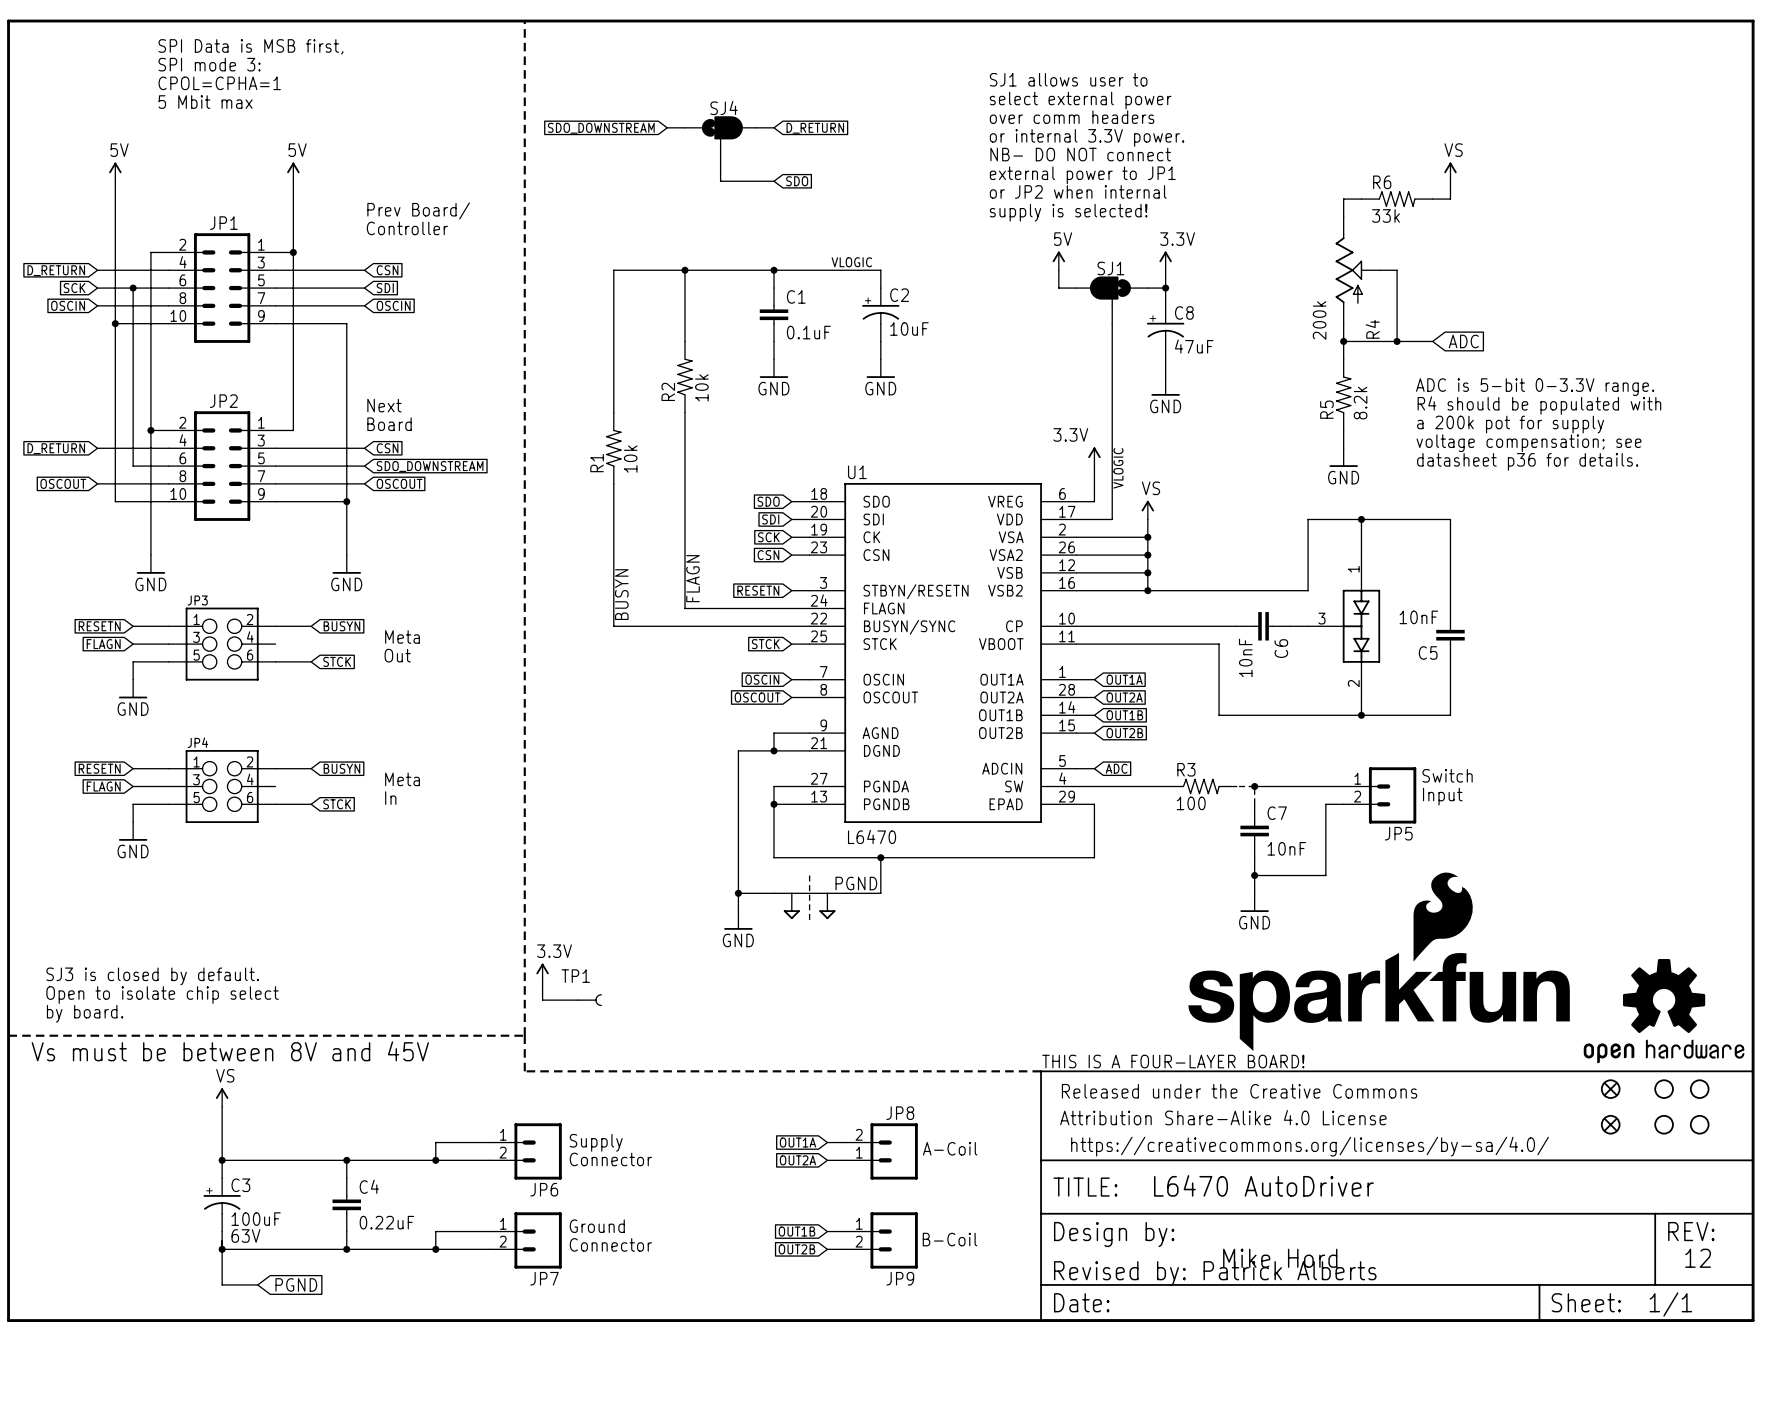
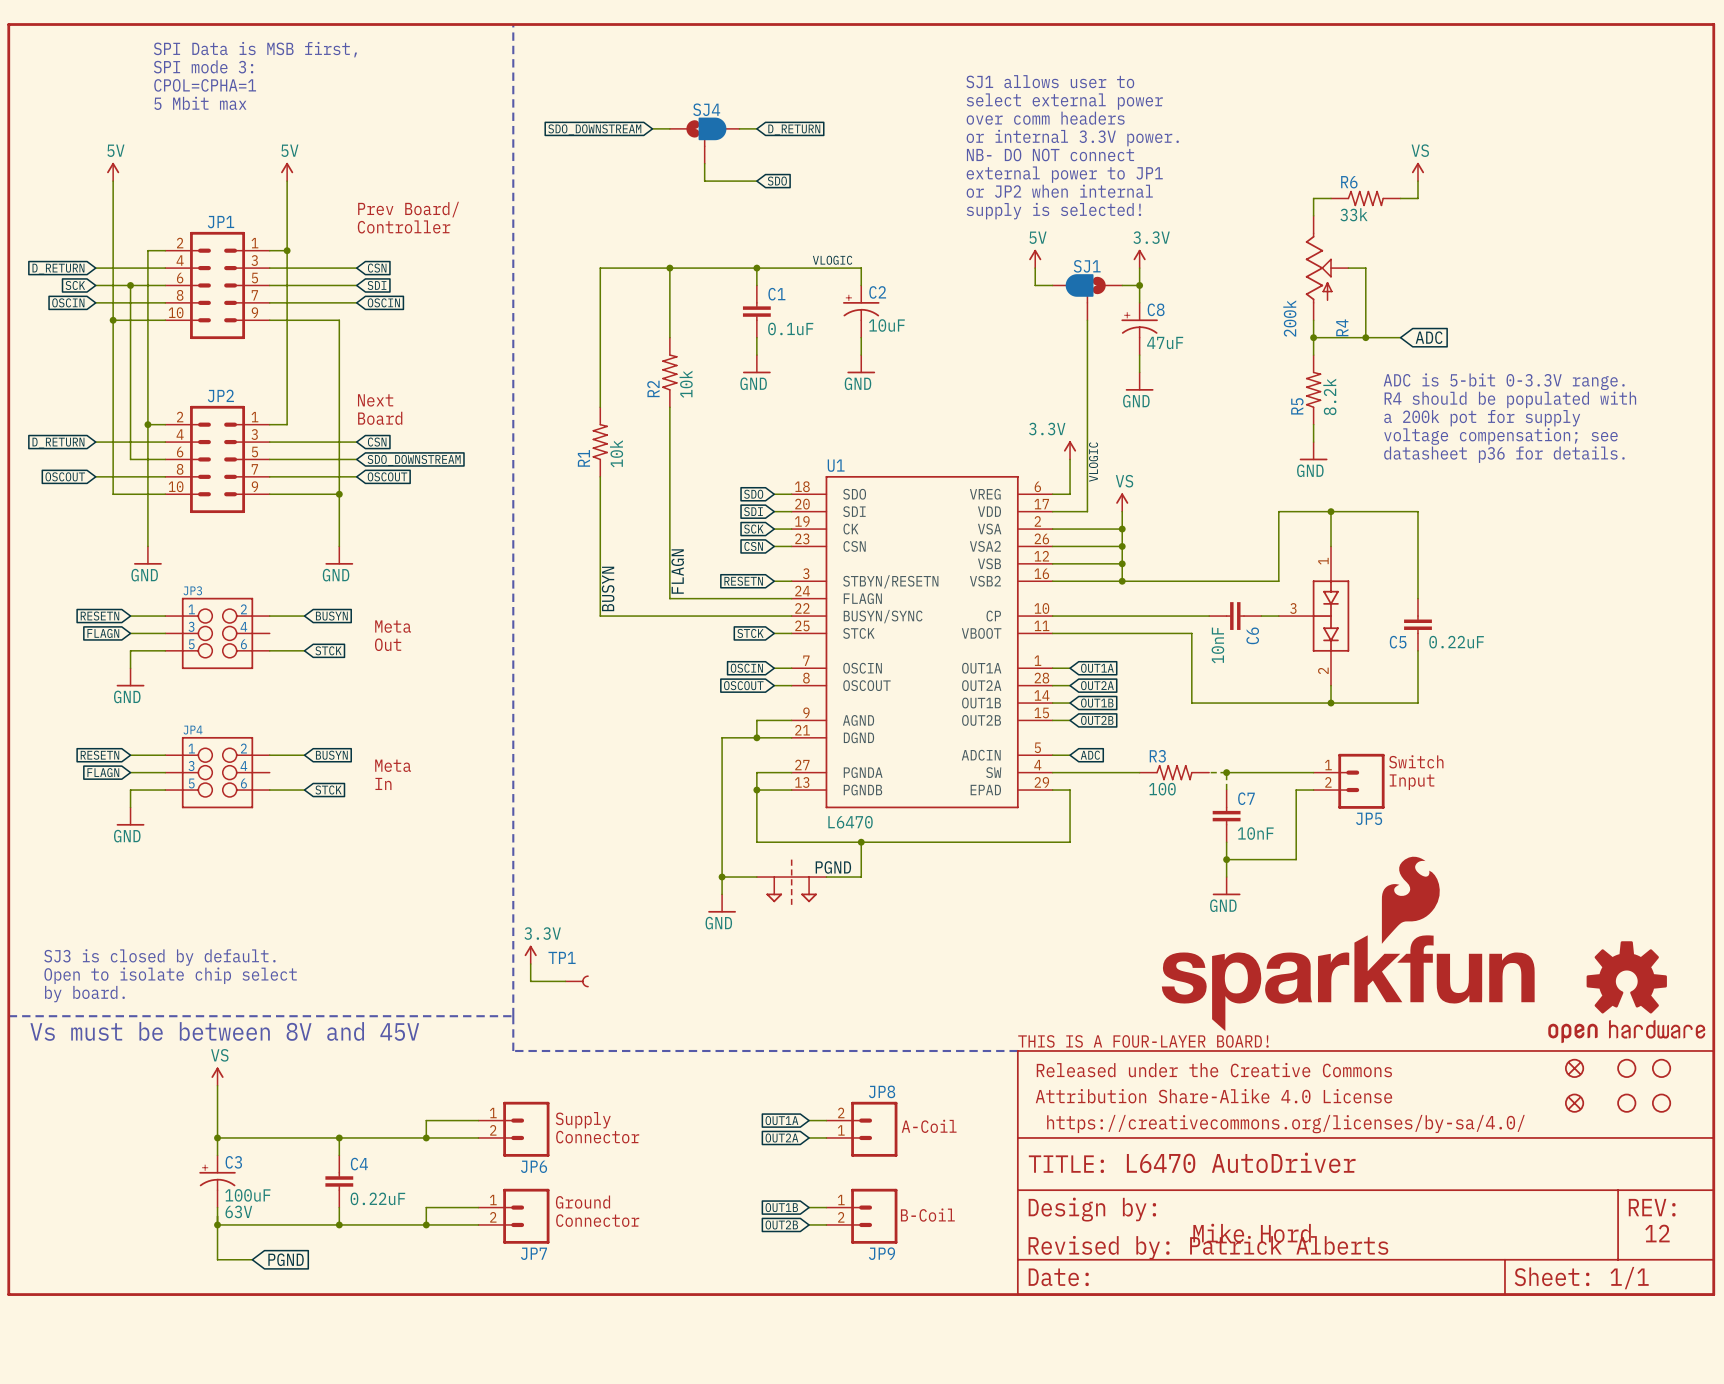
C5 value: 10nF (1418, 617) -> 0.22uF (1456, 642)

